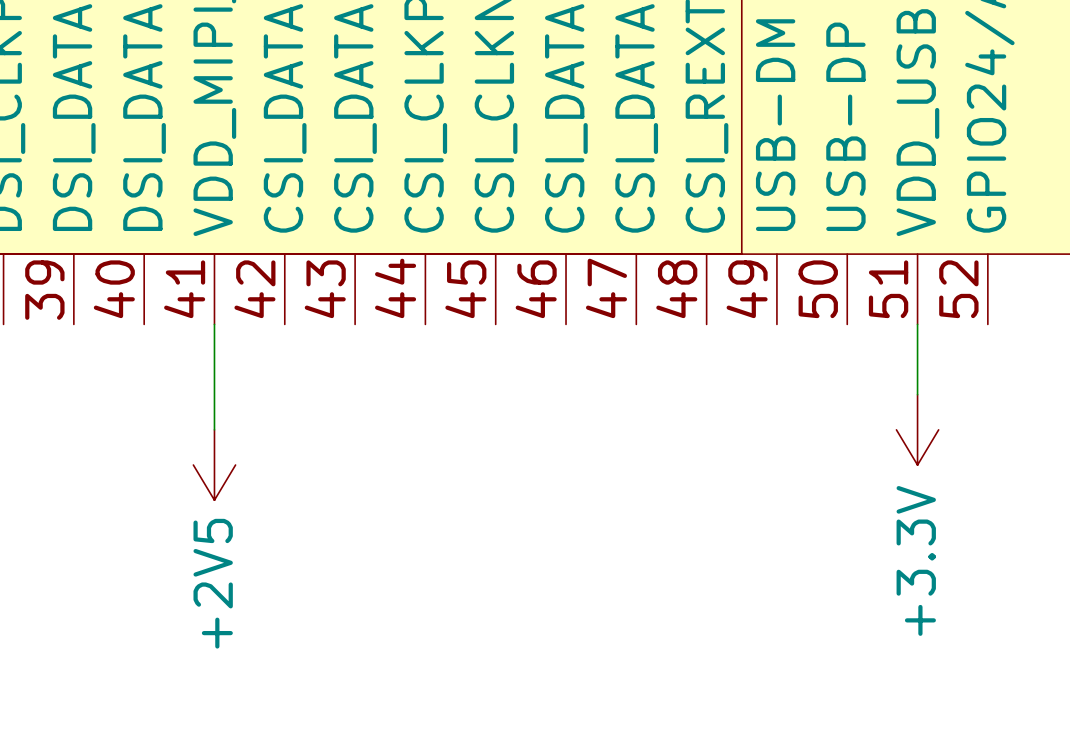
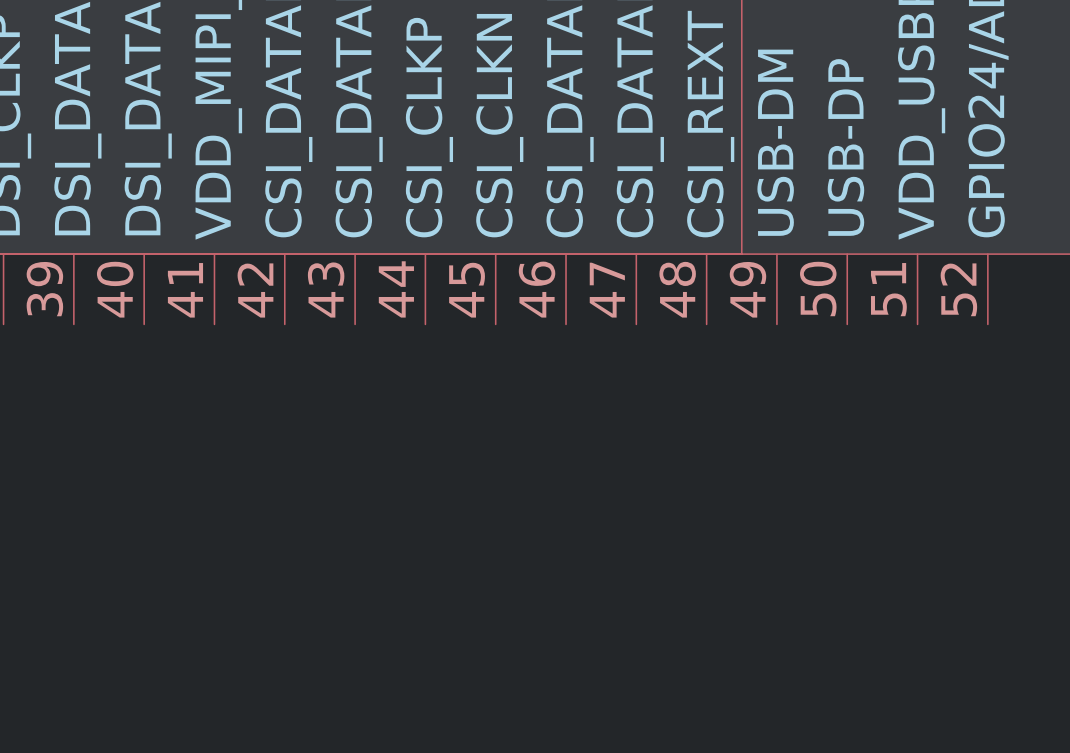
wire: (214, 324) (214, 429) -> none
wire: (917, 324) (917, 394) -> none
power symbol: +3.3V (917, 429) -> none
power symbol: +2V5 (214, 465) -> none

